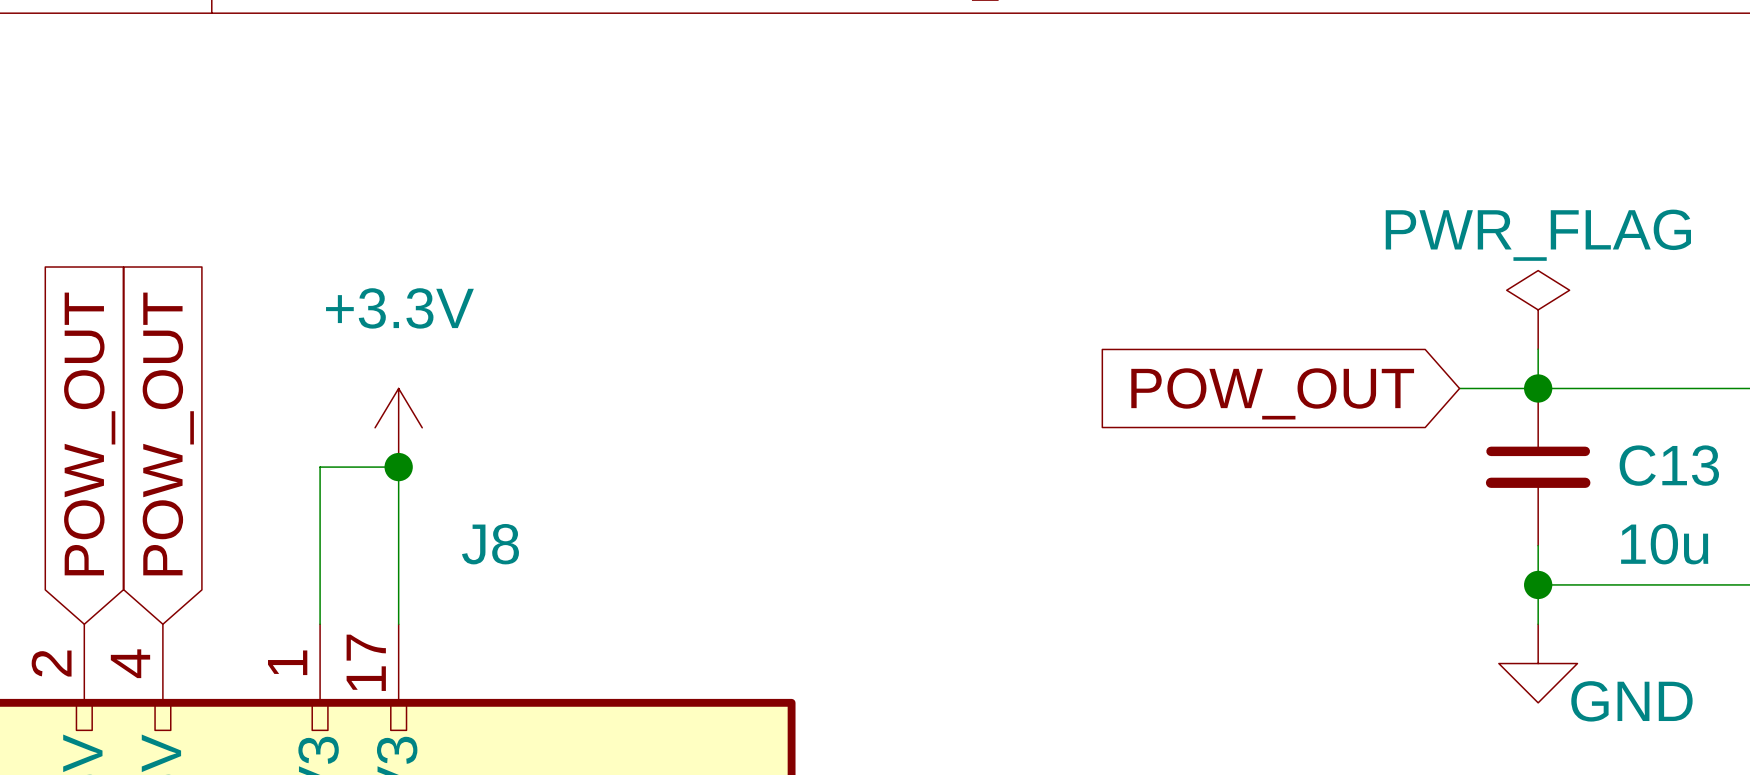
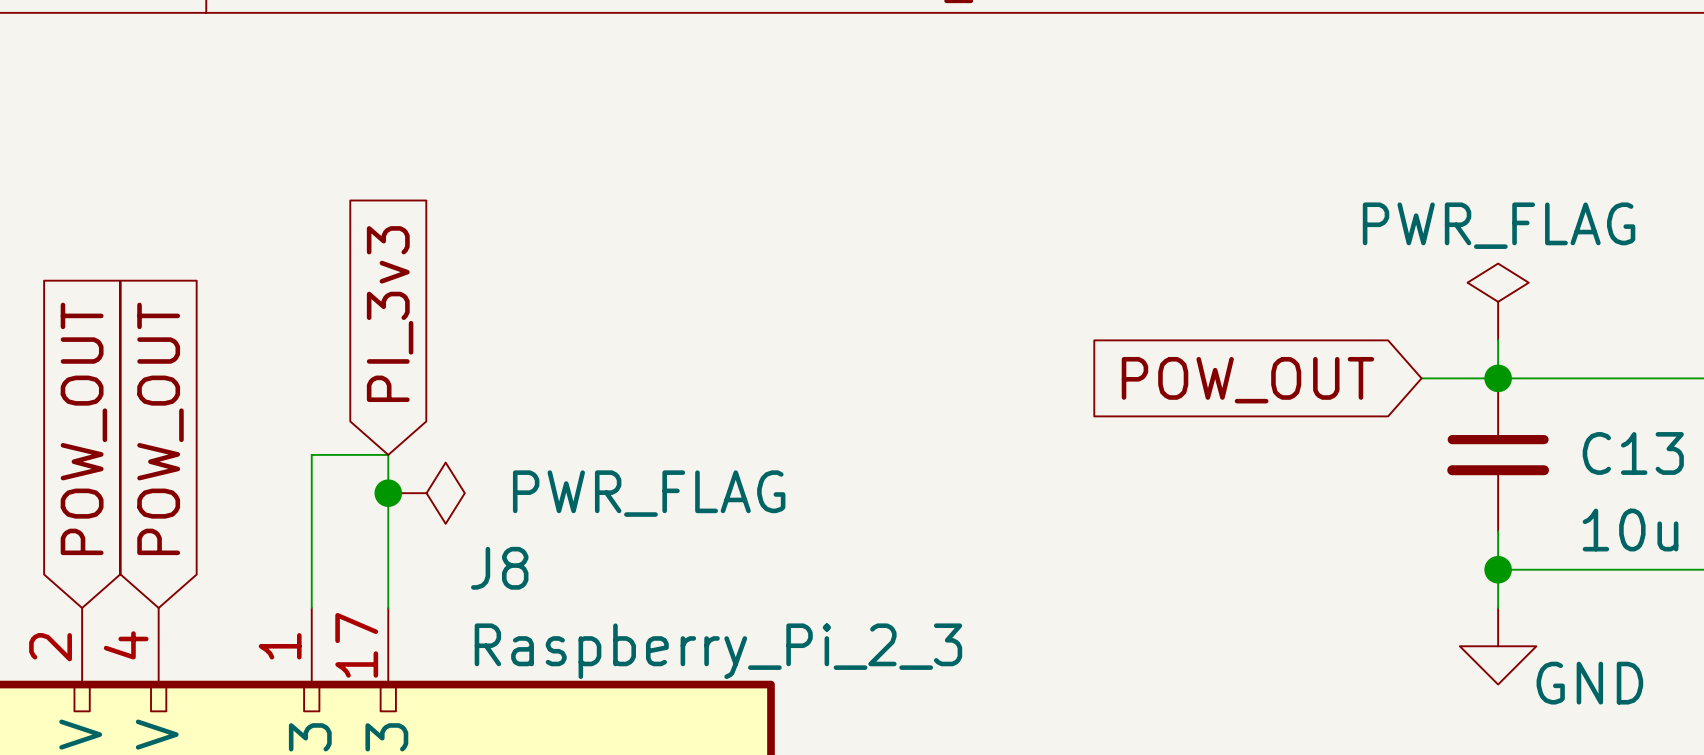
global label: none -> PI_3v3 (390, 314)
power symbol: +3.3V (398, 427) -> none
junction position: (398, 467) -> (388, 493)
power symbol: none -> PWR_FLAG (426, 493)
J8 name position: J8 (490, 544) -> J8 (499, 568)
J8 value: none -> Raspberry_Pi_2_3 (718, 651)

